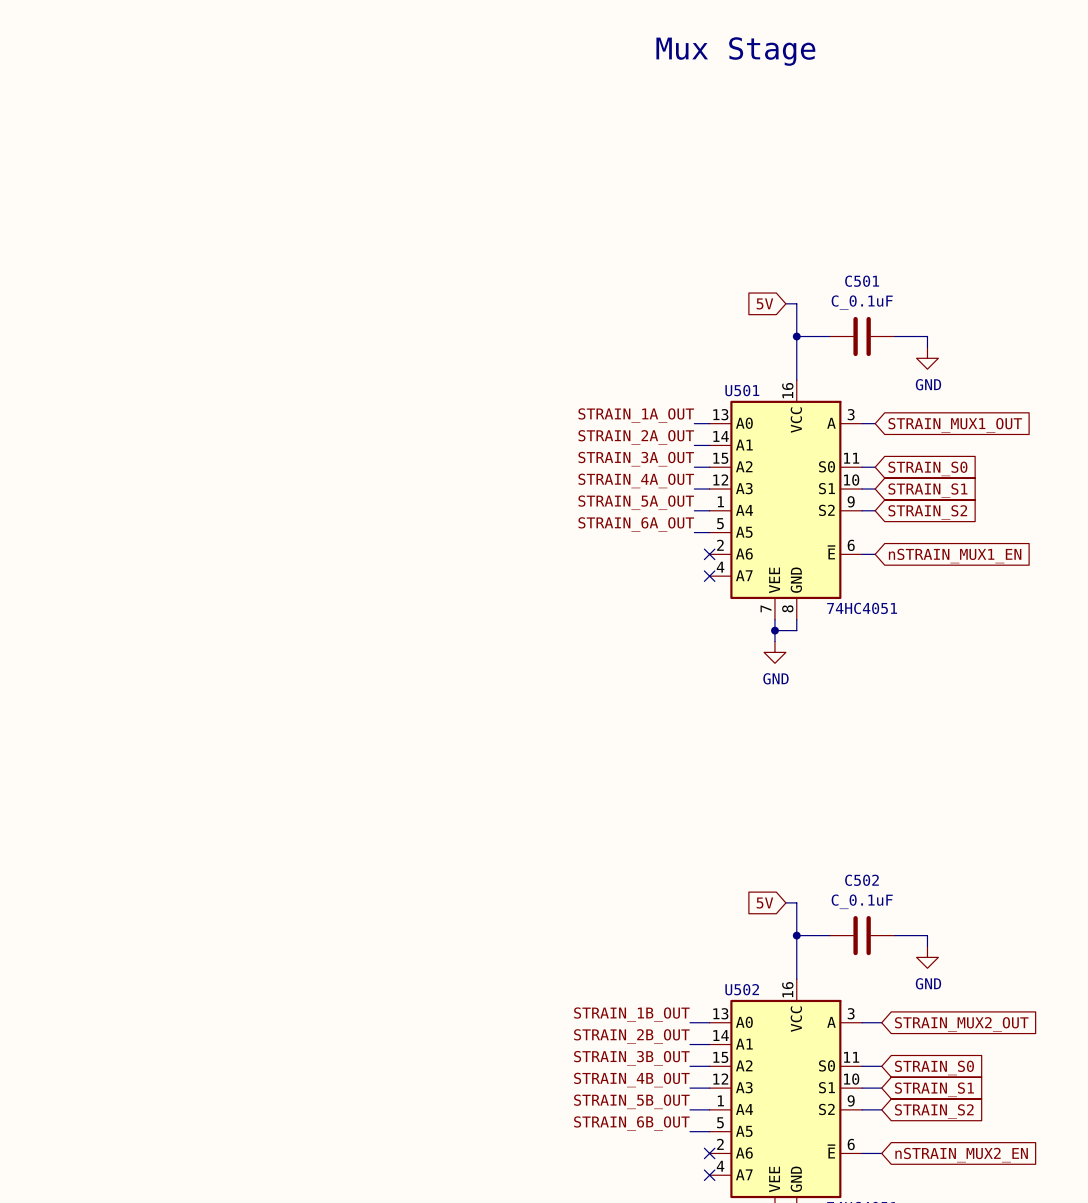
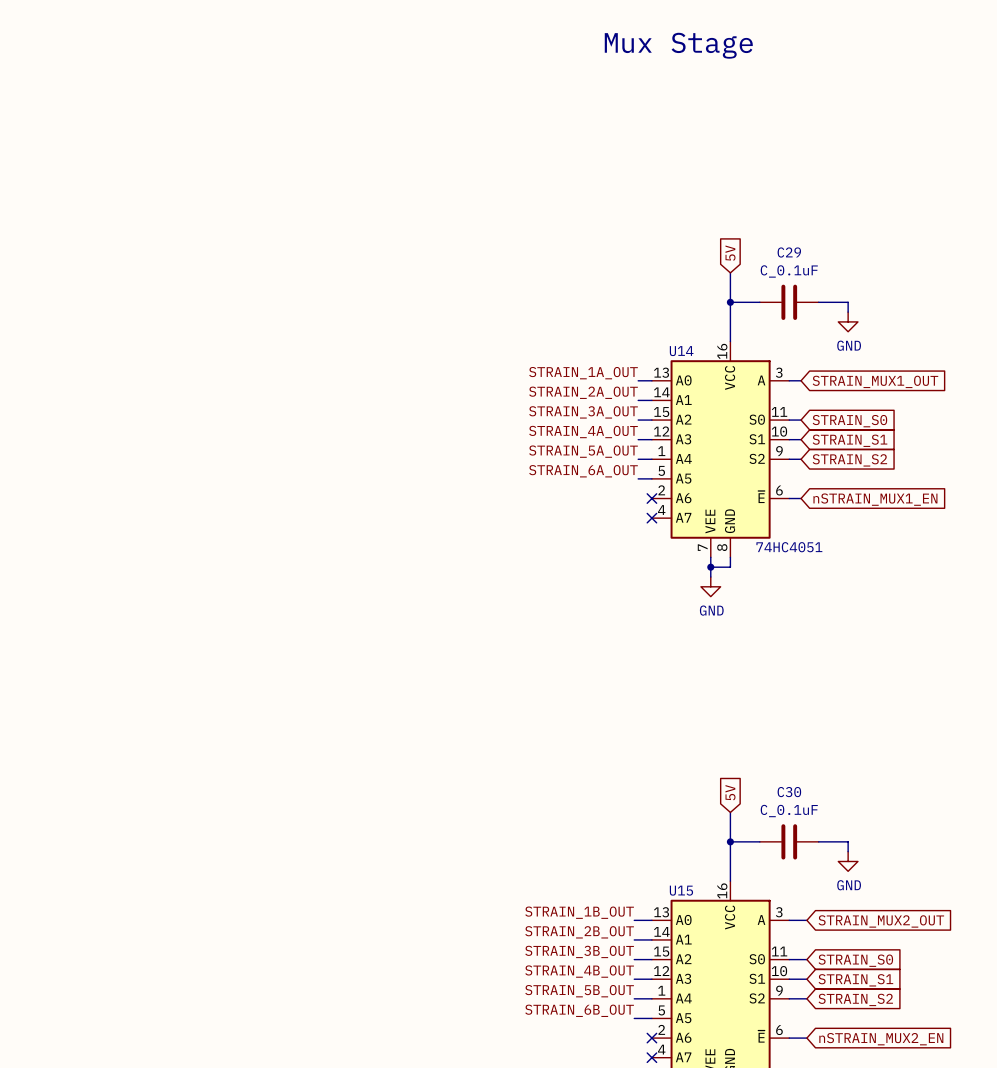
C501 name: C501 (862, 281) -> C29 (789, 252)
global label rotation: 0° (764, 303) -> 90° clockwise (730, 253)
wire: (785, 303) (796, 303) -> none
U501 name: U501 (742, 390) -> U14 (681, 351)
C502 name: C502 (861, 880) -> C30 (789, 792)
wire: (785, 902) (796, 902) -> none
global label rotation: 0° (764, 903) -> 90° clockwise (730, 792)
U502 name: U502 (742, 989) -> U15 (681, 890)

